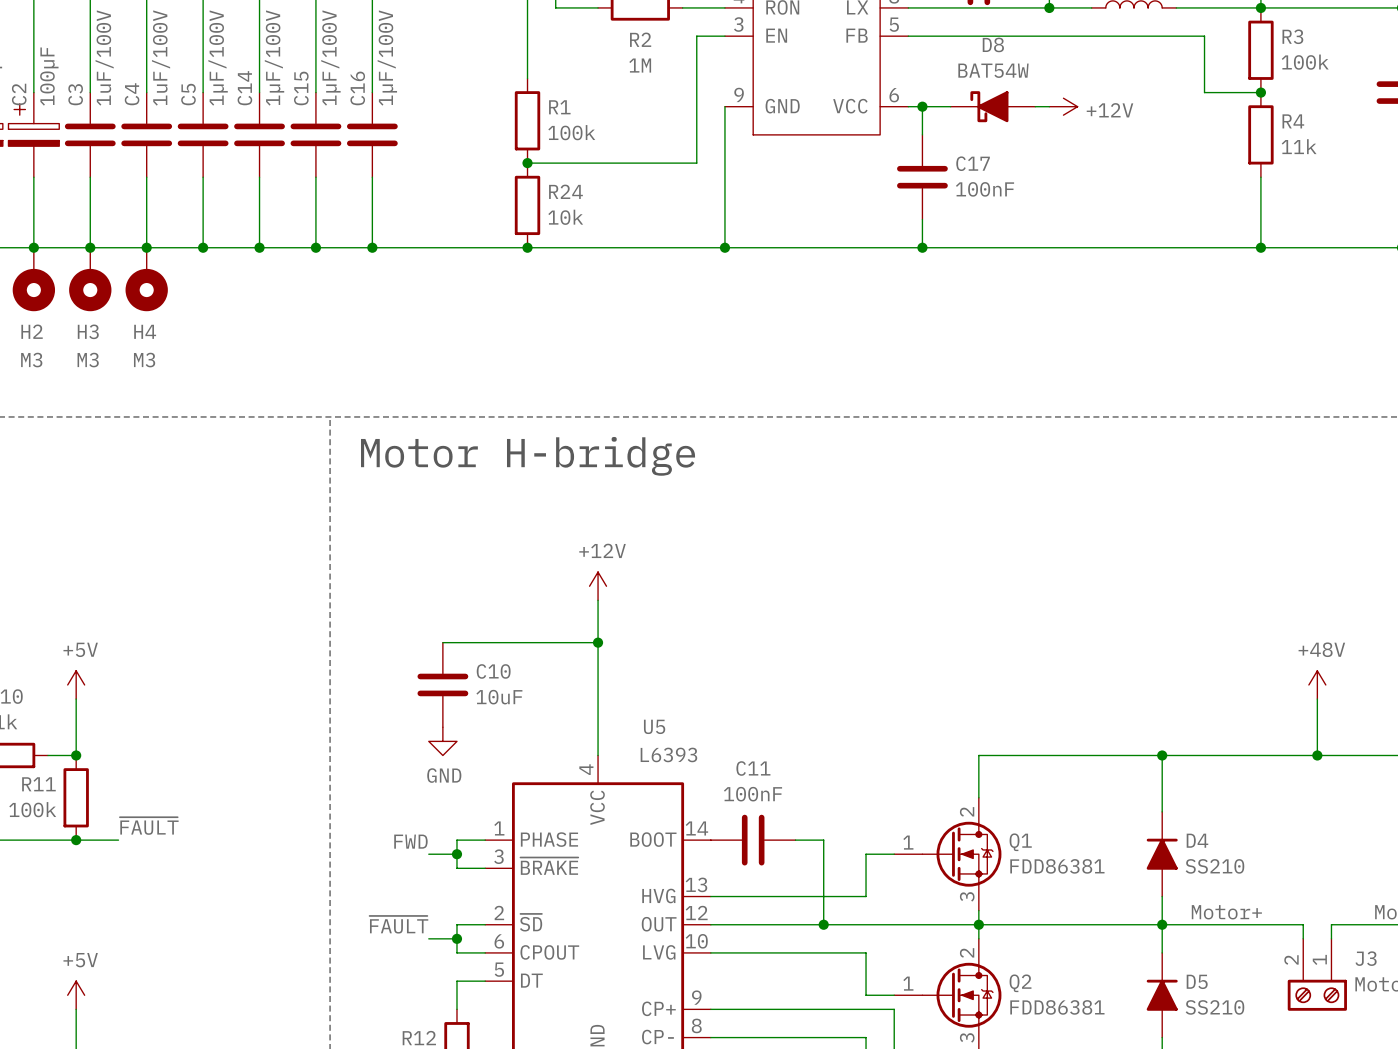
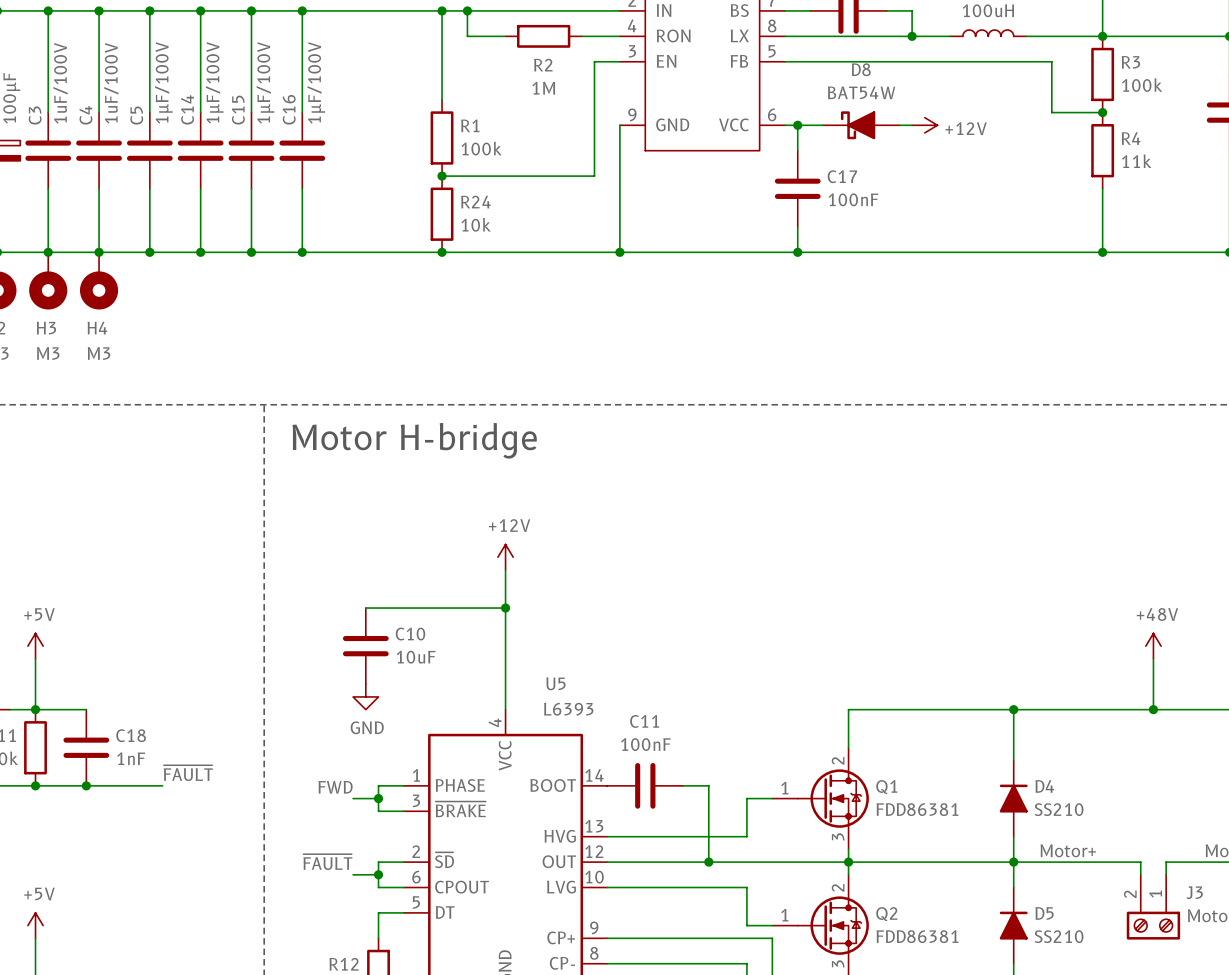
wire: none -> (35, 709) (86, 709)
C18: none -> 1nF (86, 747)
label position: ~{FAULT} (149, 826) -> ~{FAULT} (188, 773)
wire: none -> (73, 785) (162, 785)
junction: none -> (86, 785)

